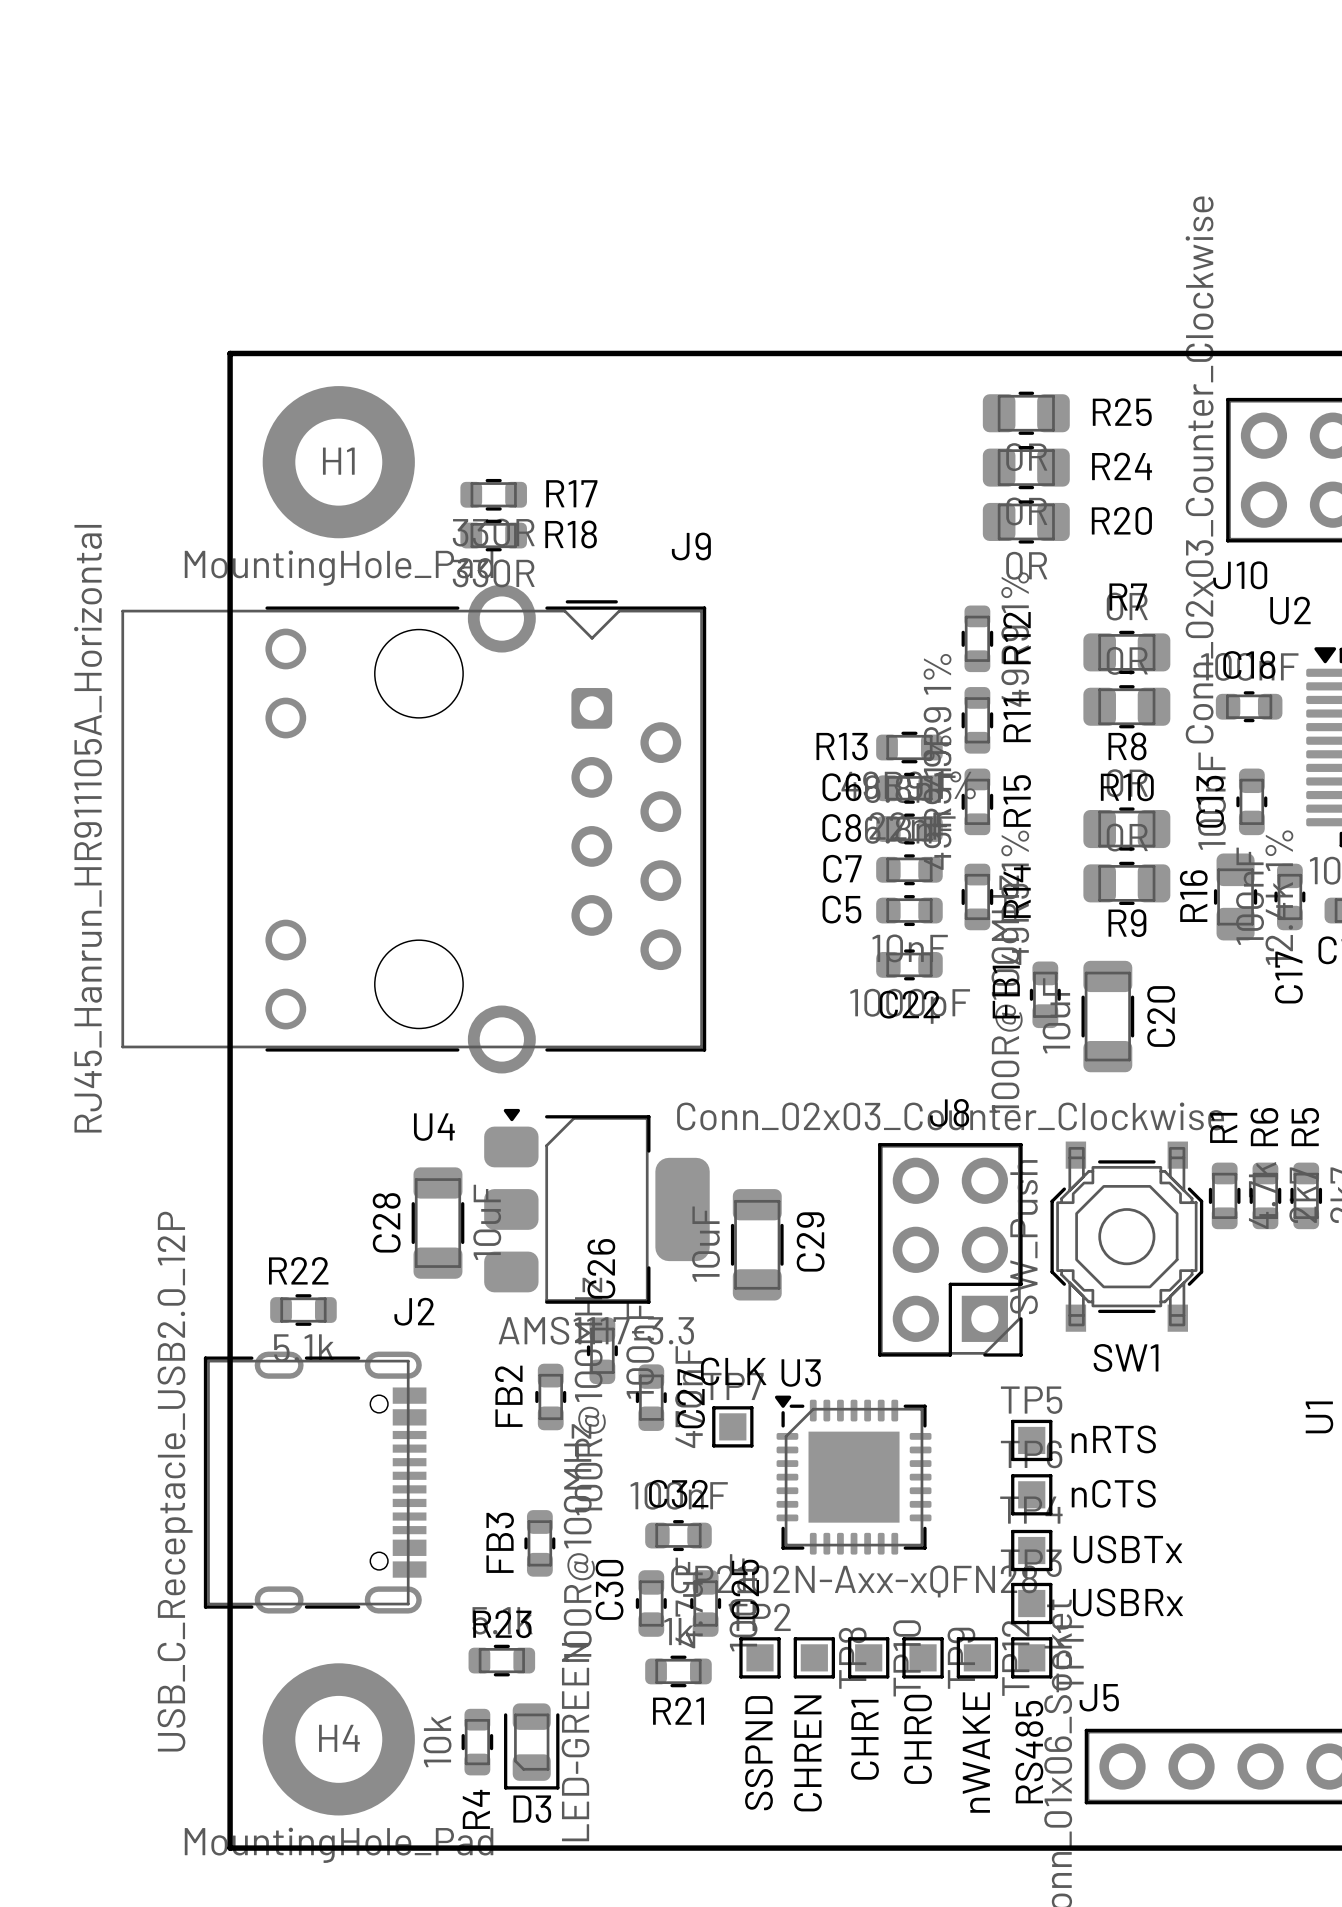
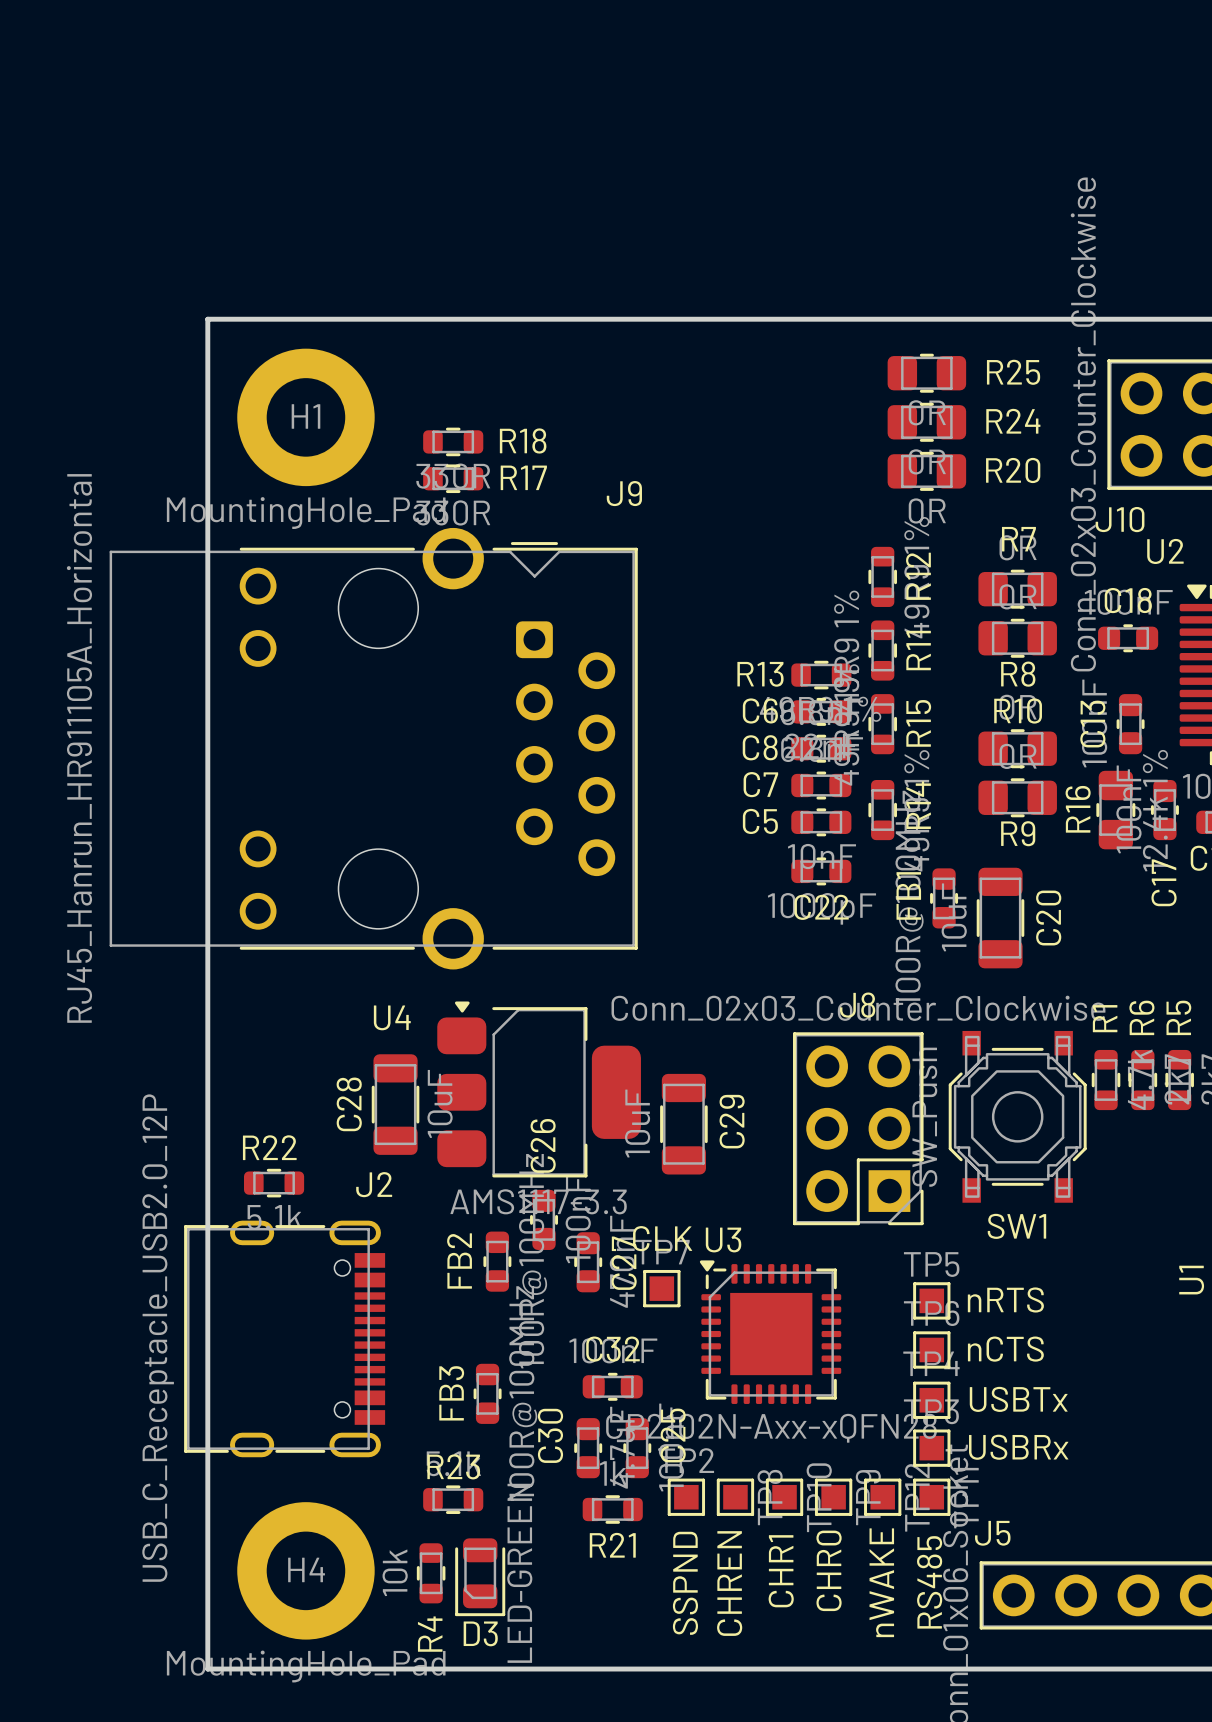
R17 position: (493, 494) -> (453, 478)
R18 position: (493, 535) -> (453, 441)

